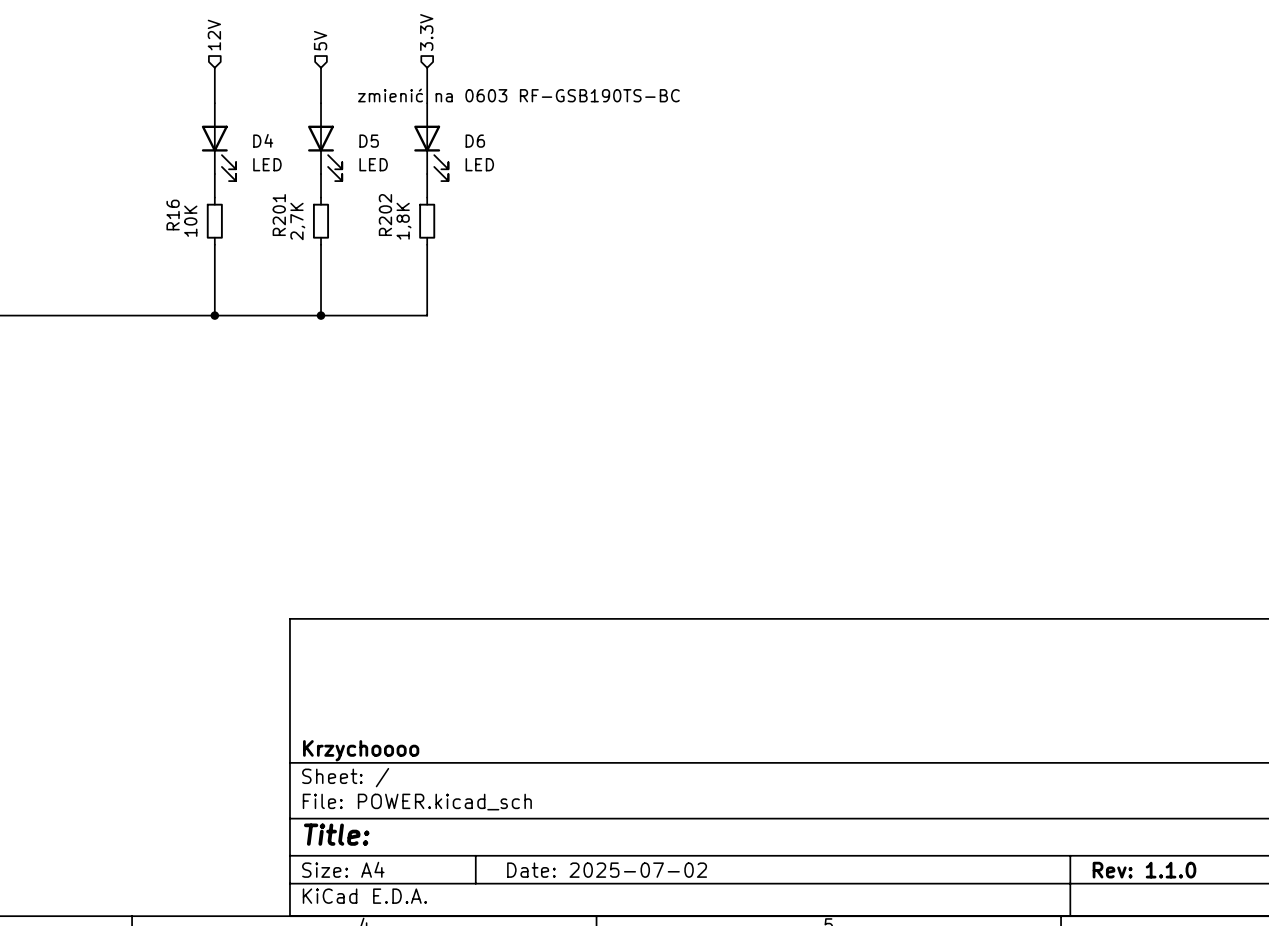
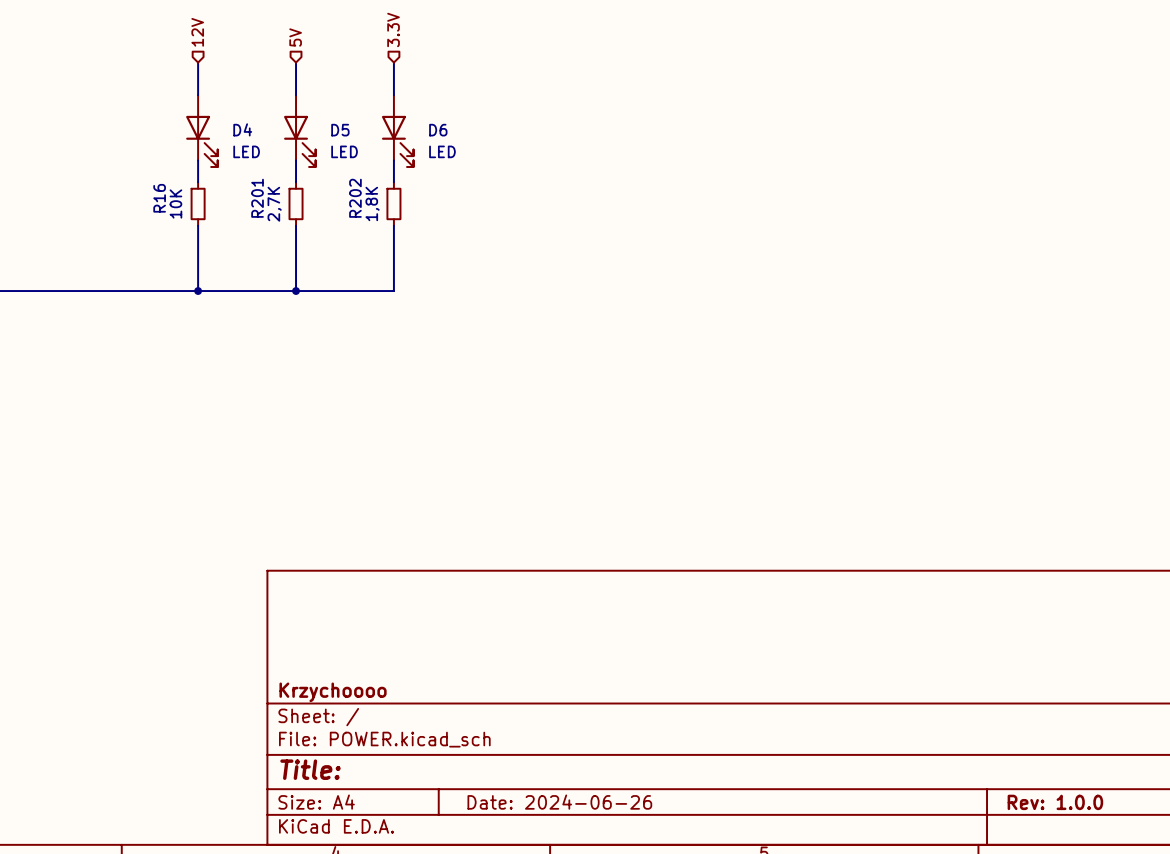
text: zmienić na 0603 RF-GSB190TS-BC (518, 95) -> none
title block: Date: 2025-07-02 (607, 870) -> Date: 2024-06-26 (559, 802)
title block: Rev: 1.1.0 (1144, 870) -> Rev: 1.0.0 (1055, 802)

